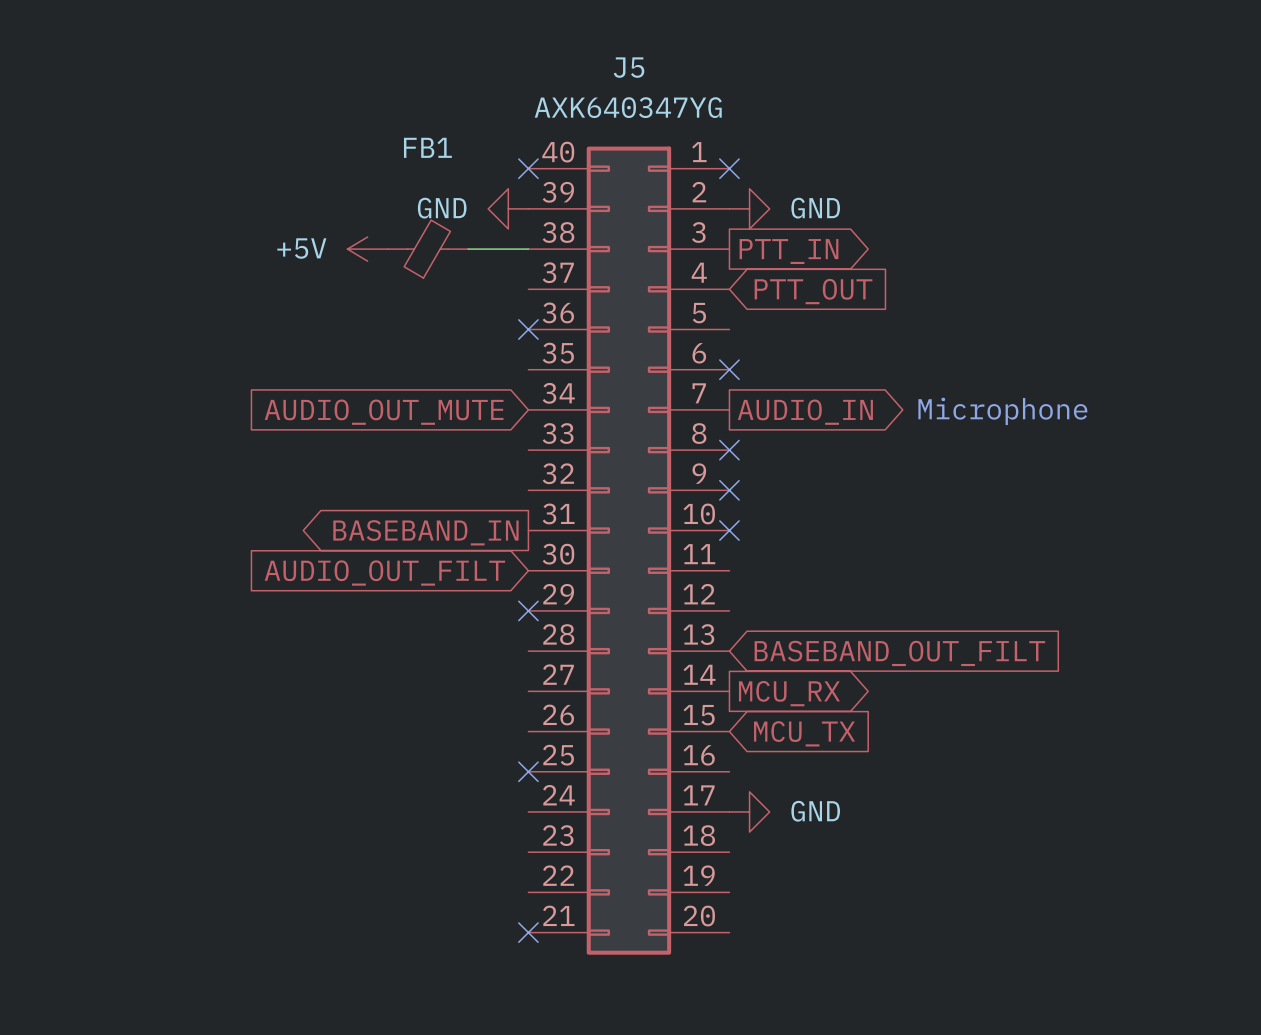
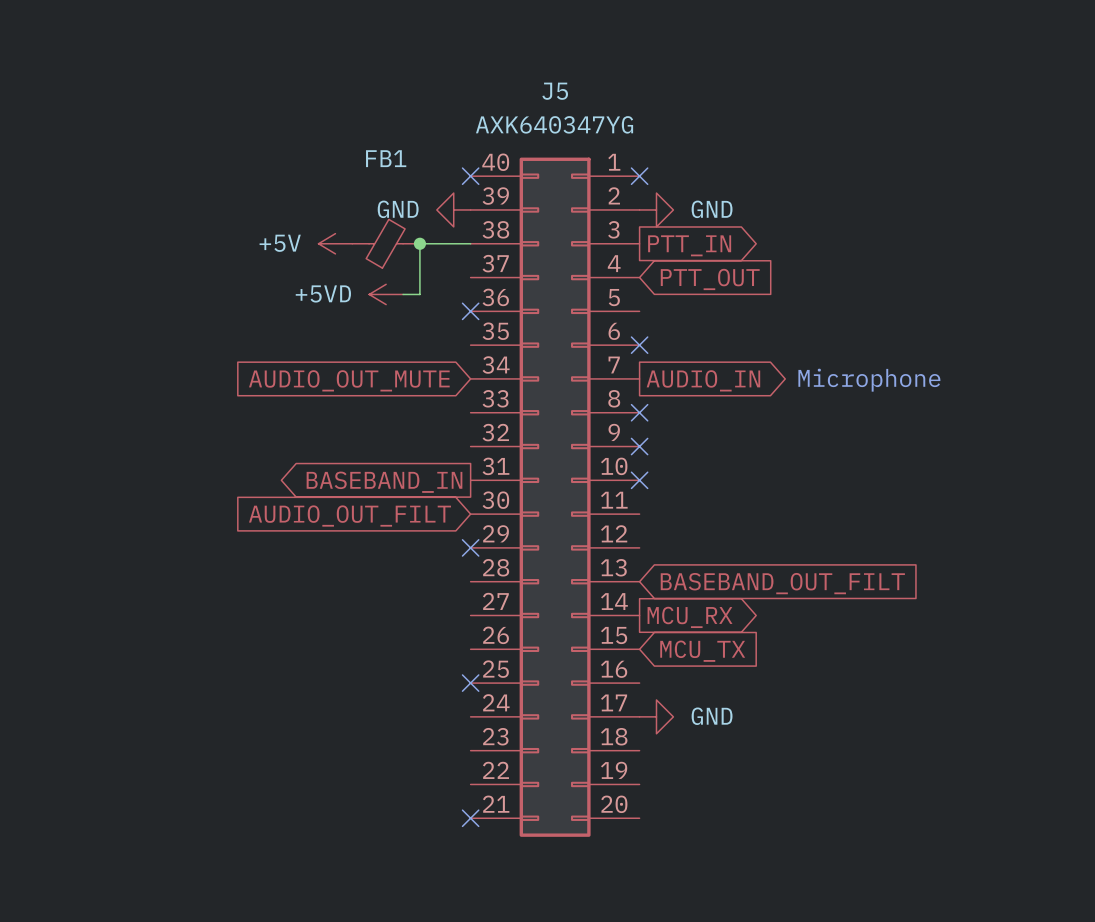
wire: none -> (419, 243) (419, 294) (403, 294)
junction: none -> (419, 243)
power symbol: none -> +5VD (386, 294)

